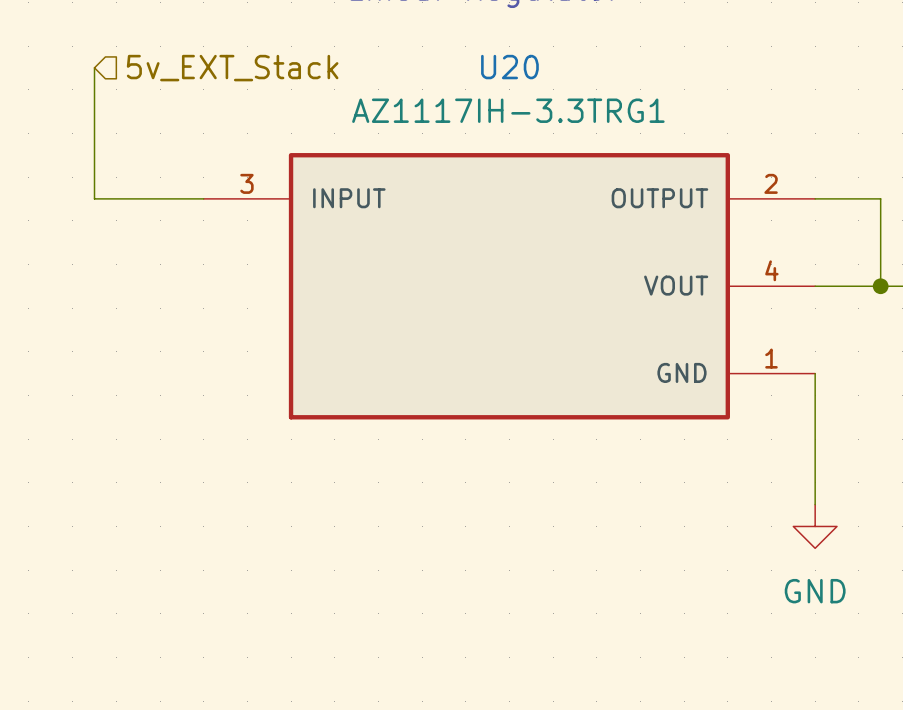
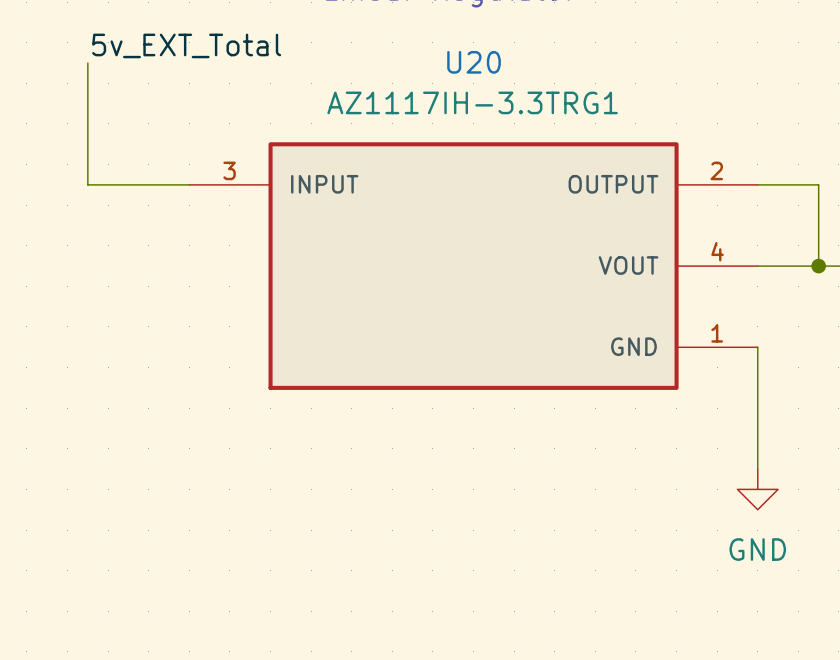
label: none -> 5v_EXT_Total (186, 45)
hierarchical label: 5v_EXT_Stack (232, 68) -> none

